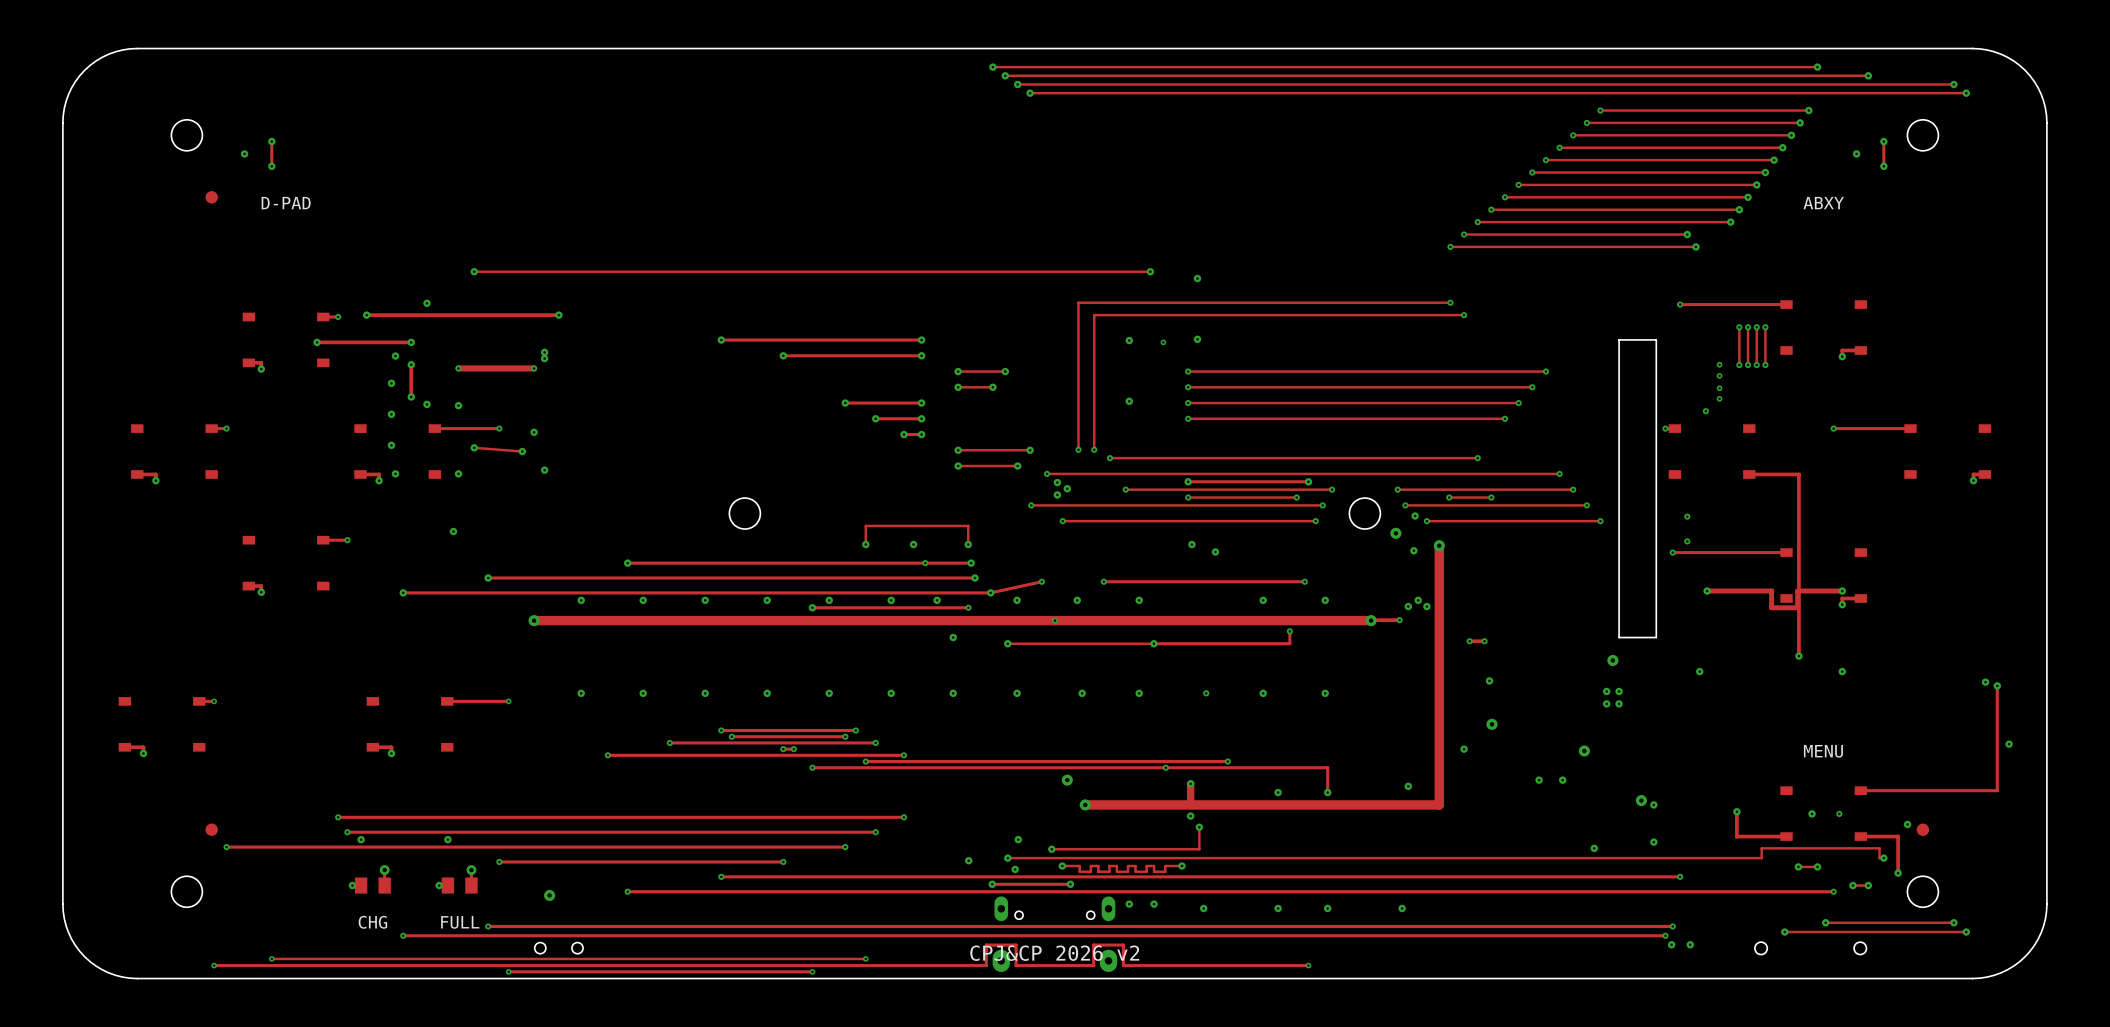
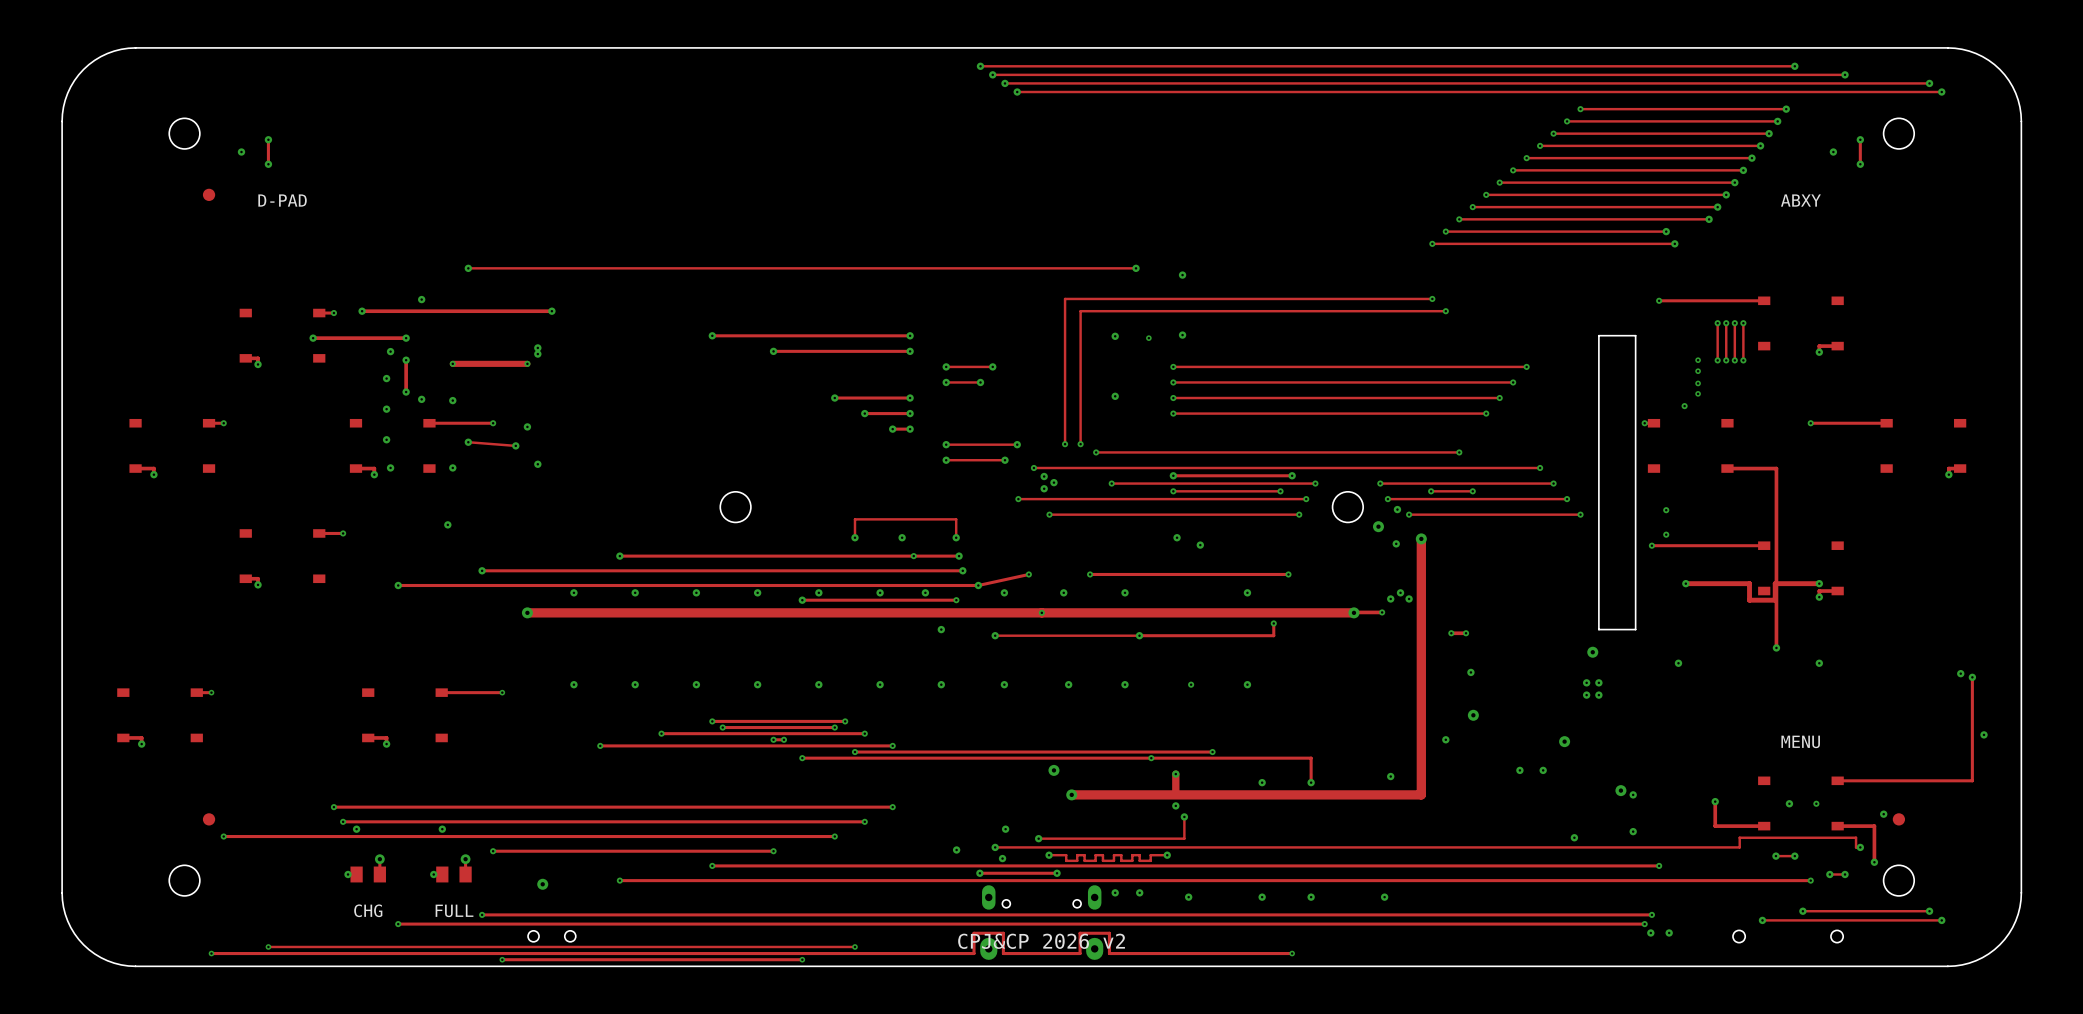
via: (1325, 600) -> none
via: (1325, 693) -> none

